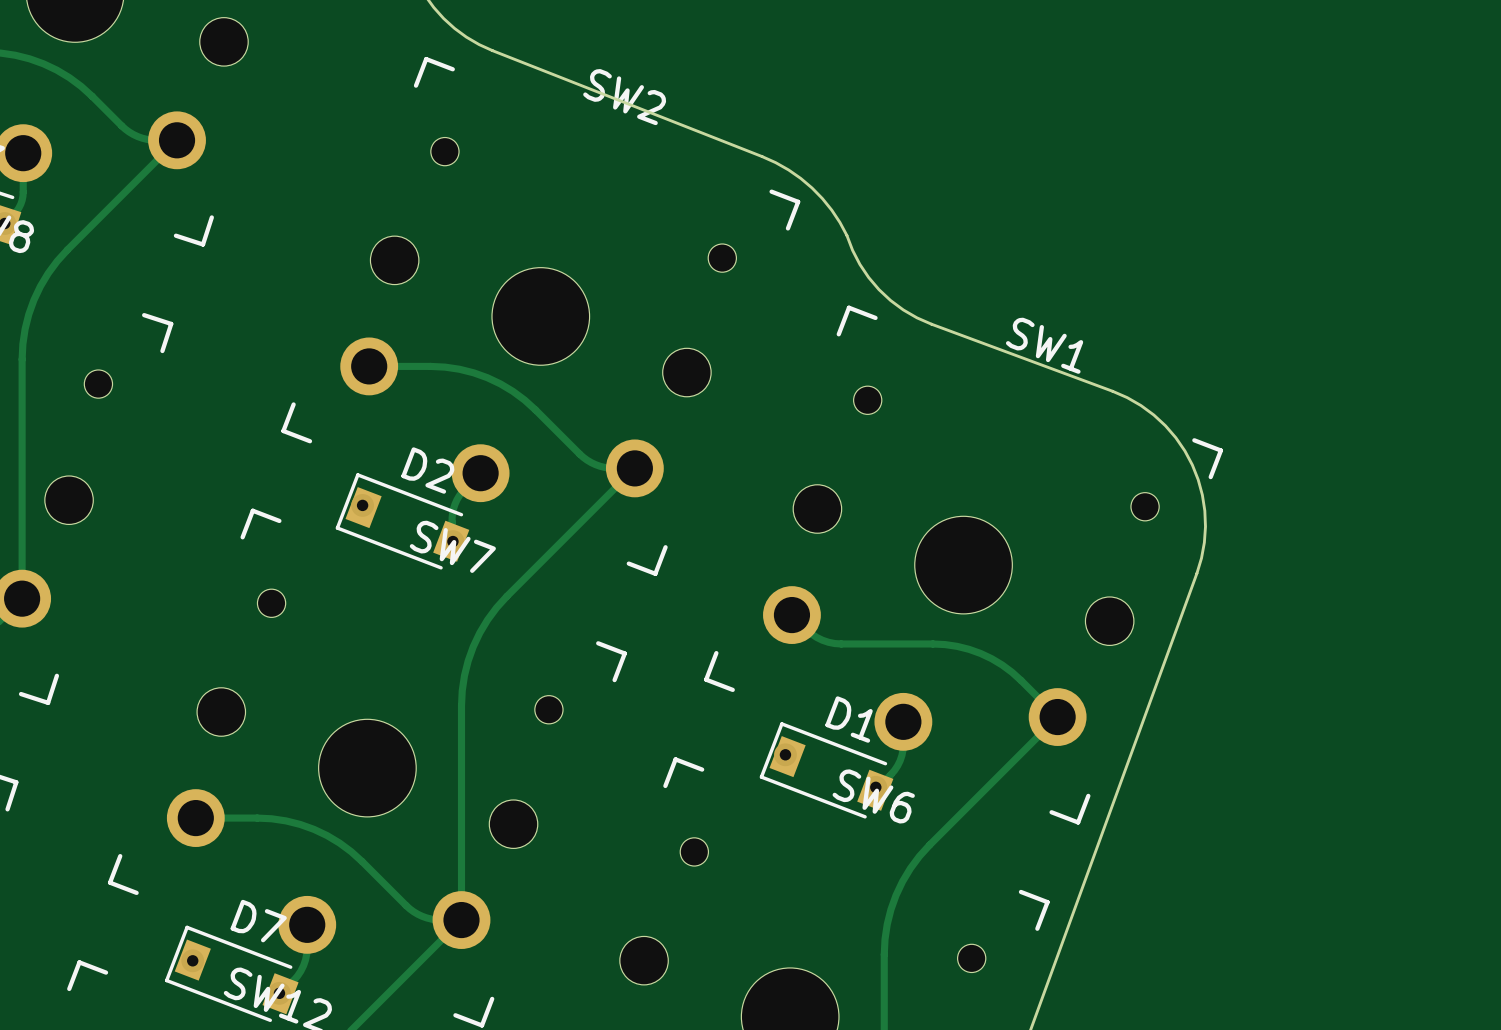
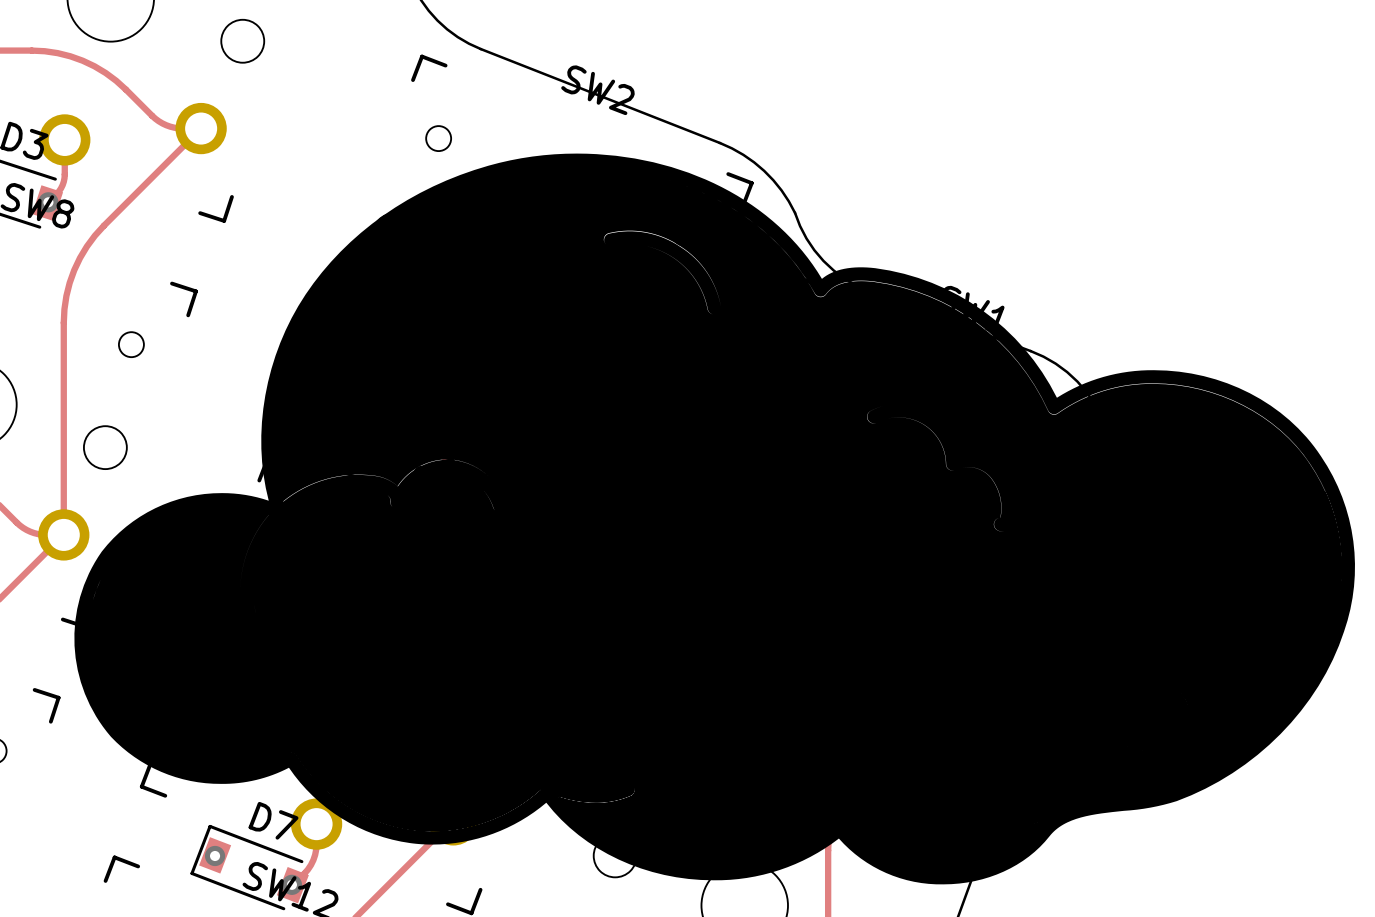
drawing: none -> [74, 153, 1355, 885]

